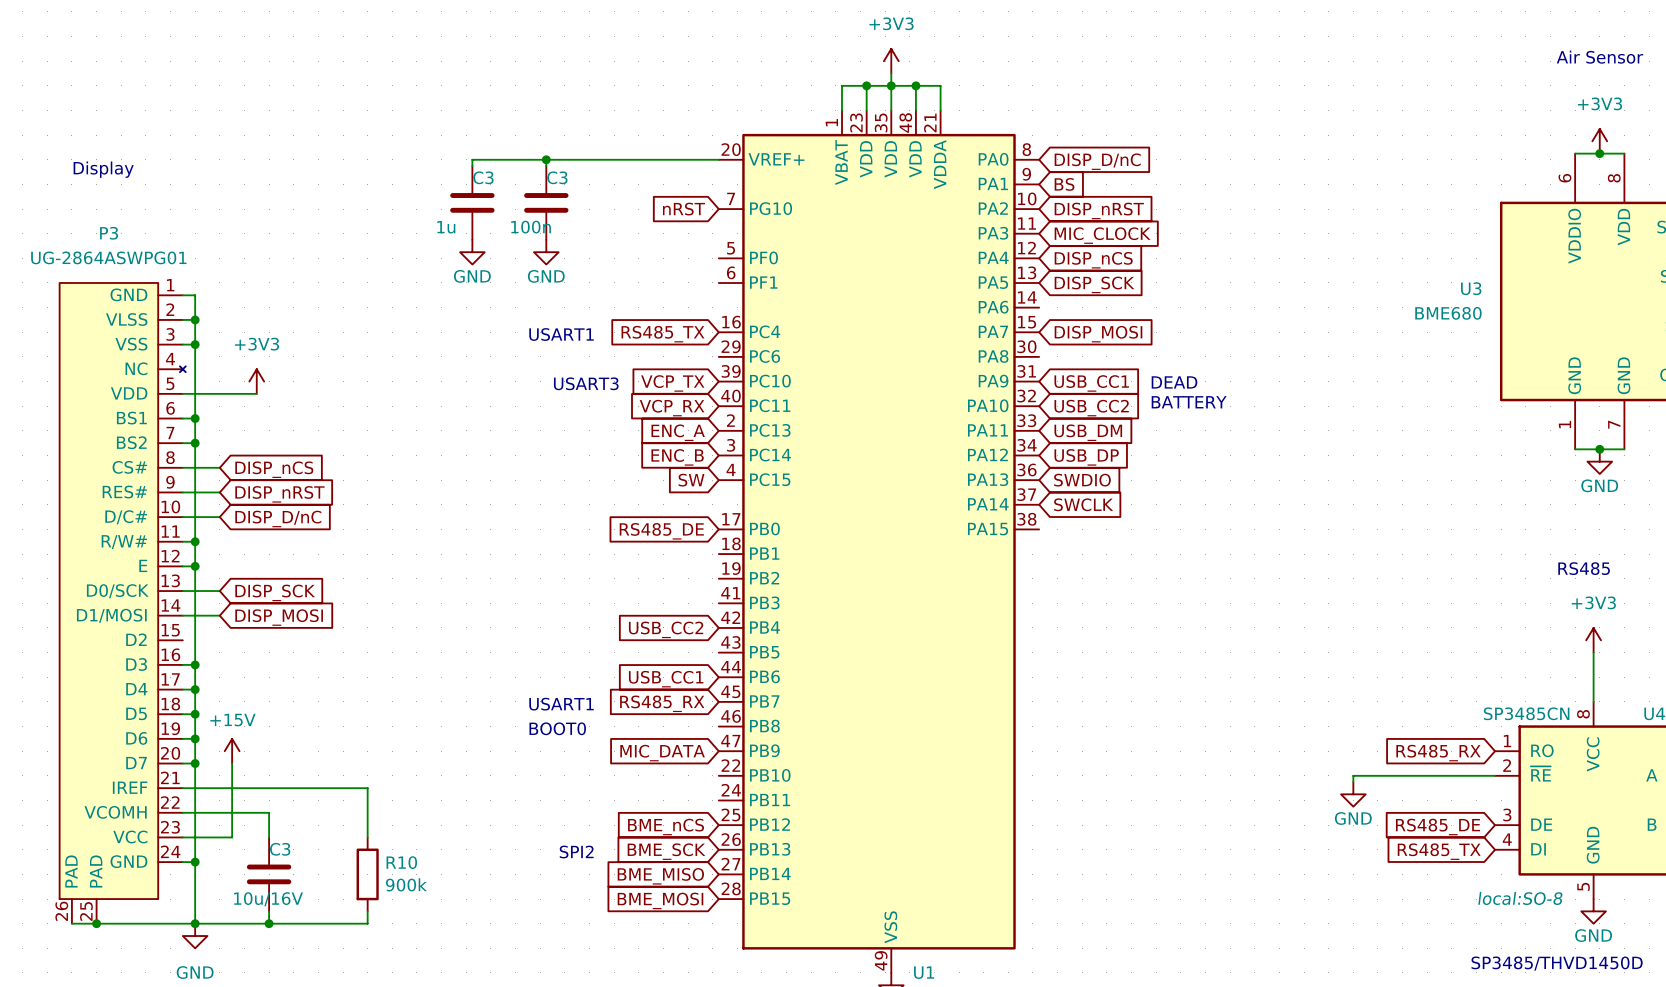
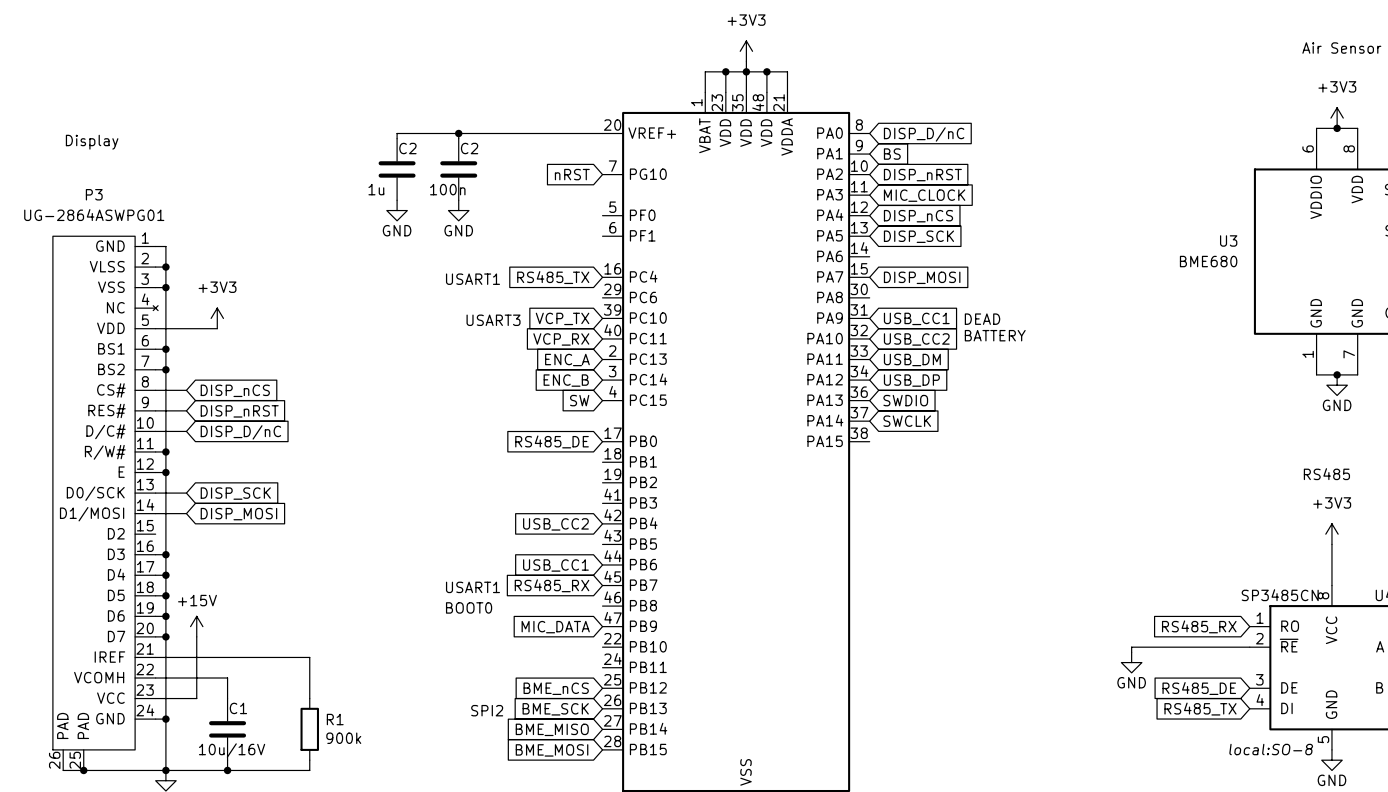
C3 name: C3 (483, 177) -> C2 (407, 148)
C3 name: C3 (557, 177) -> C2 (469, 148)
C3 name: C3 (280, 849) -> C1 (238, 708)
R10 name: R10 (401, 862) -> R1 (335, 719)

